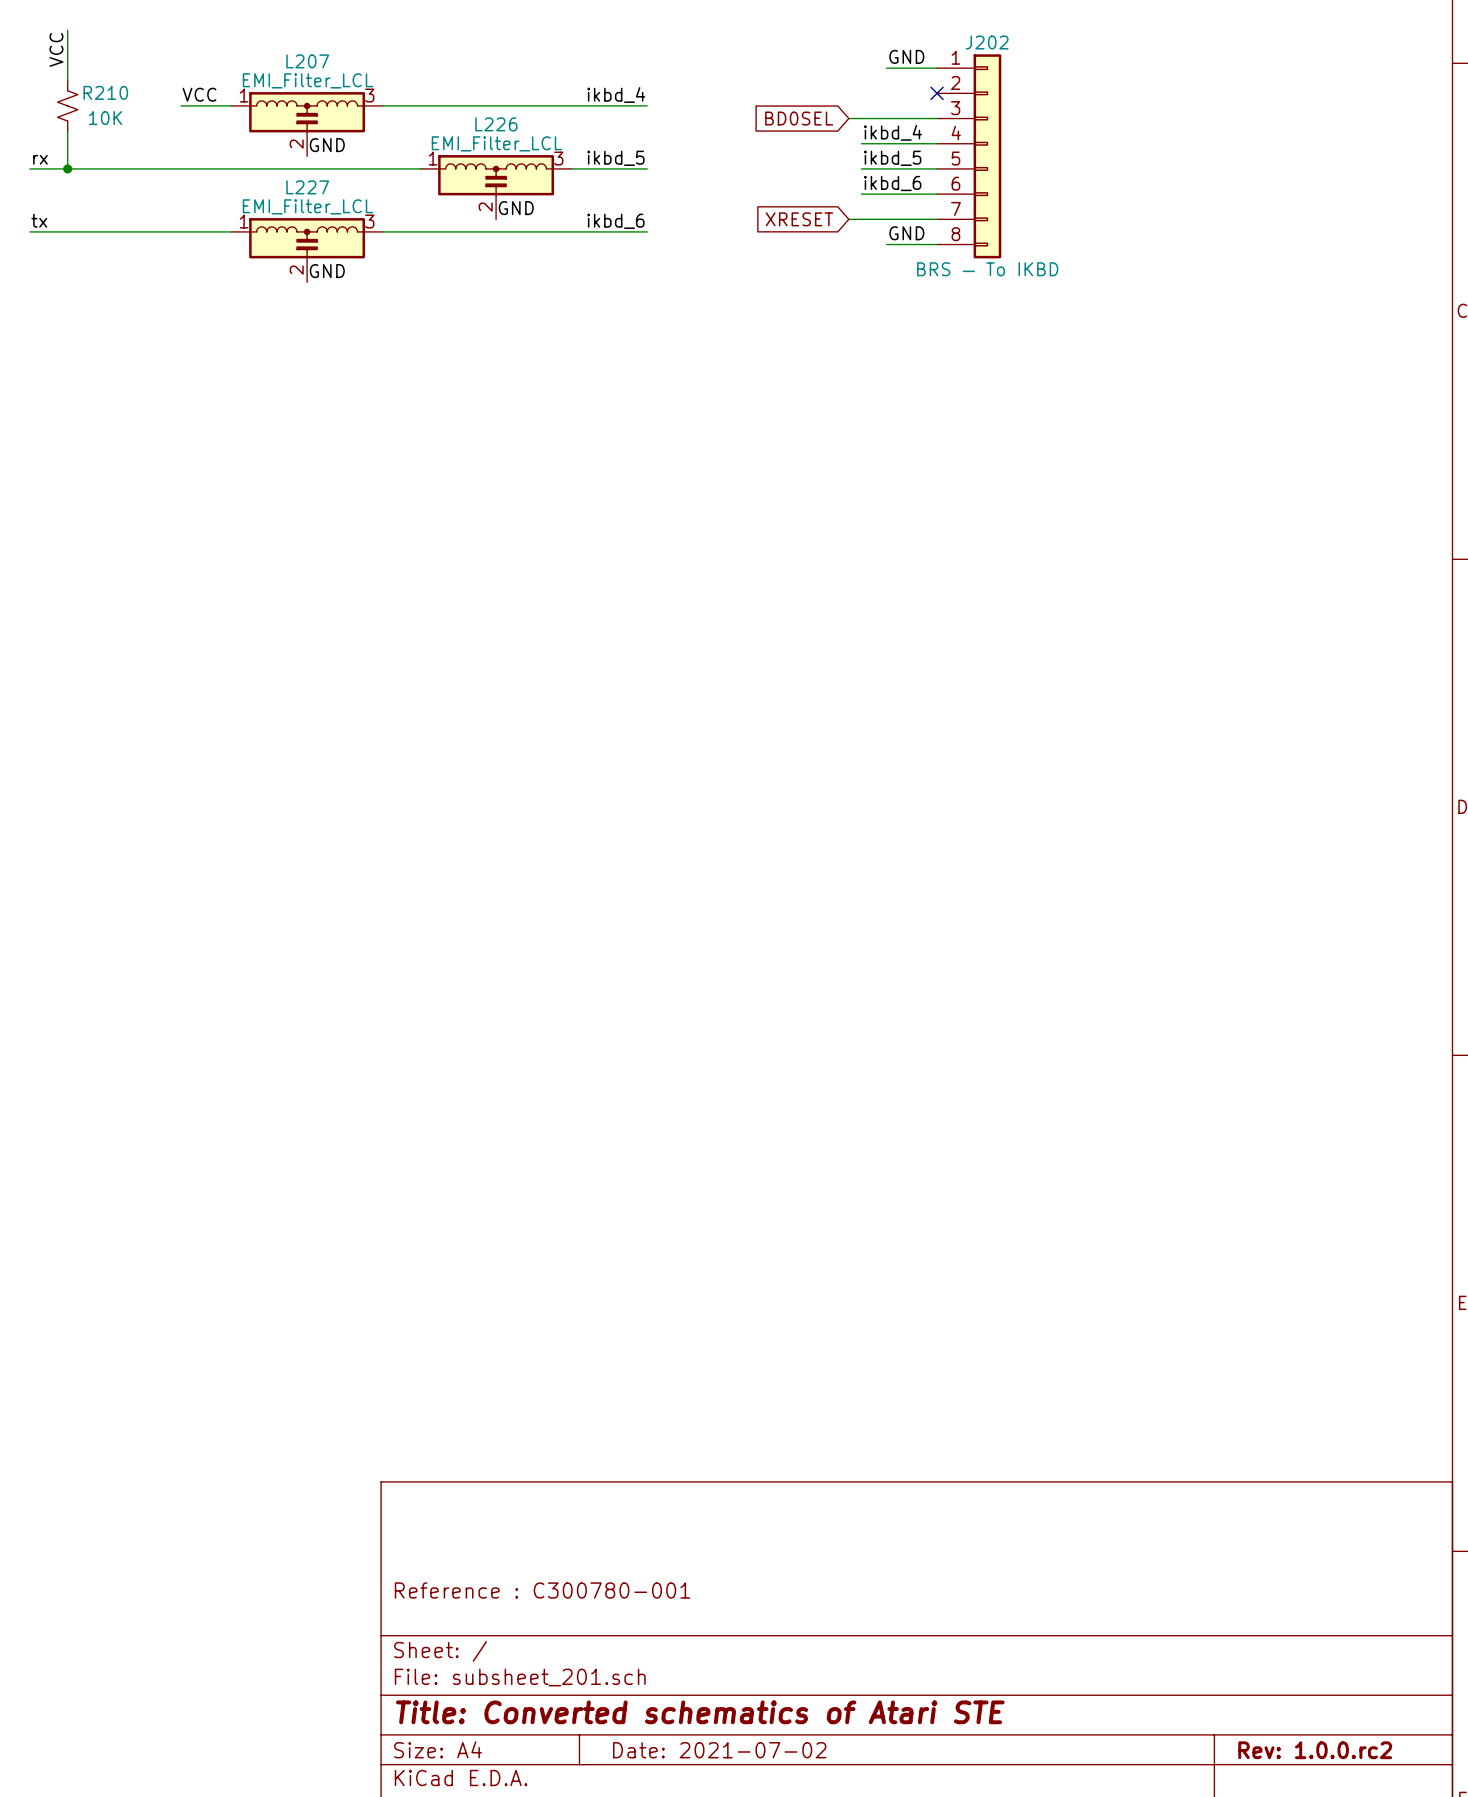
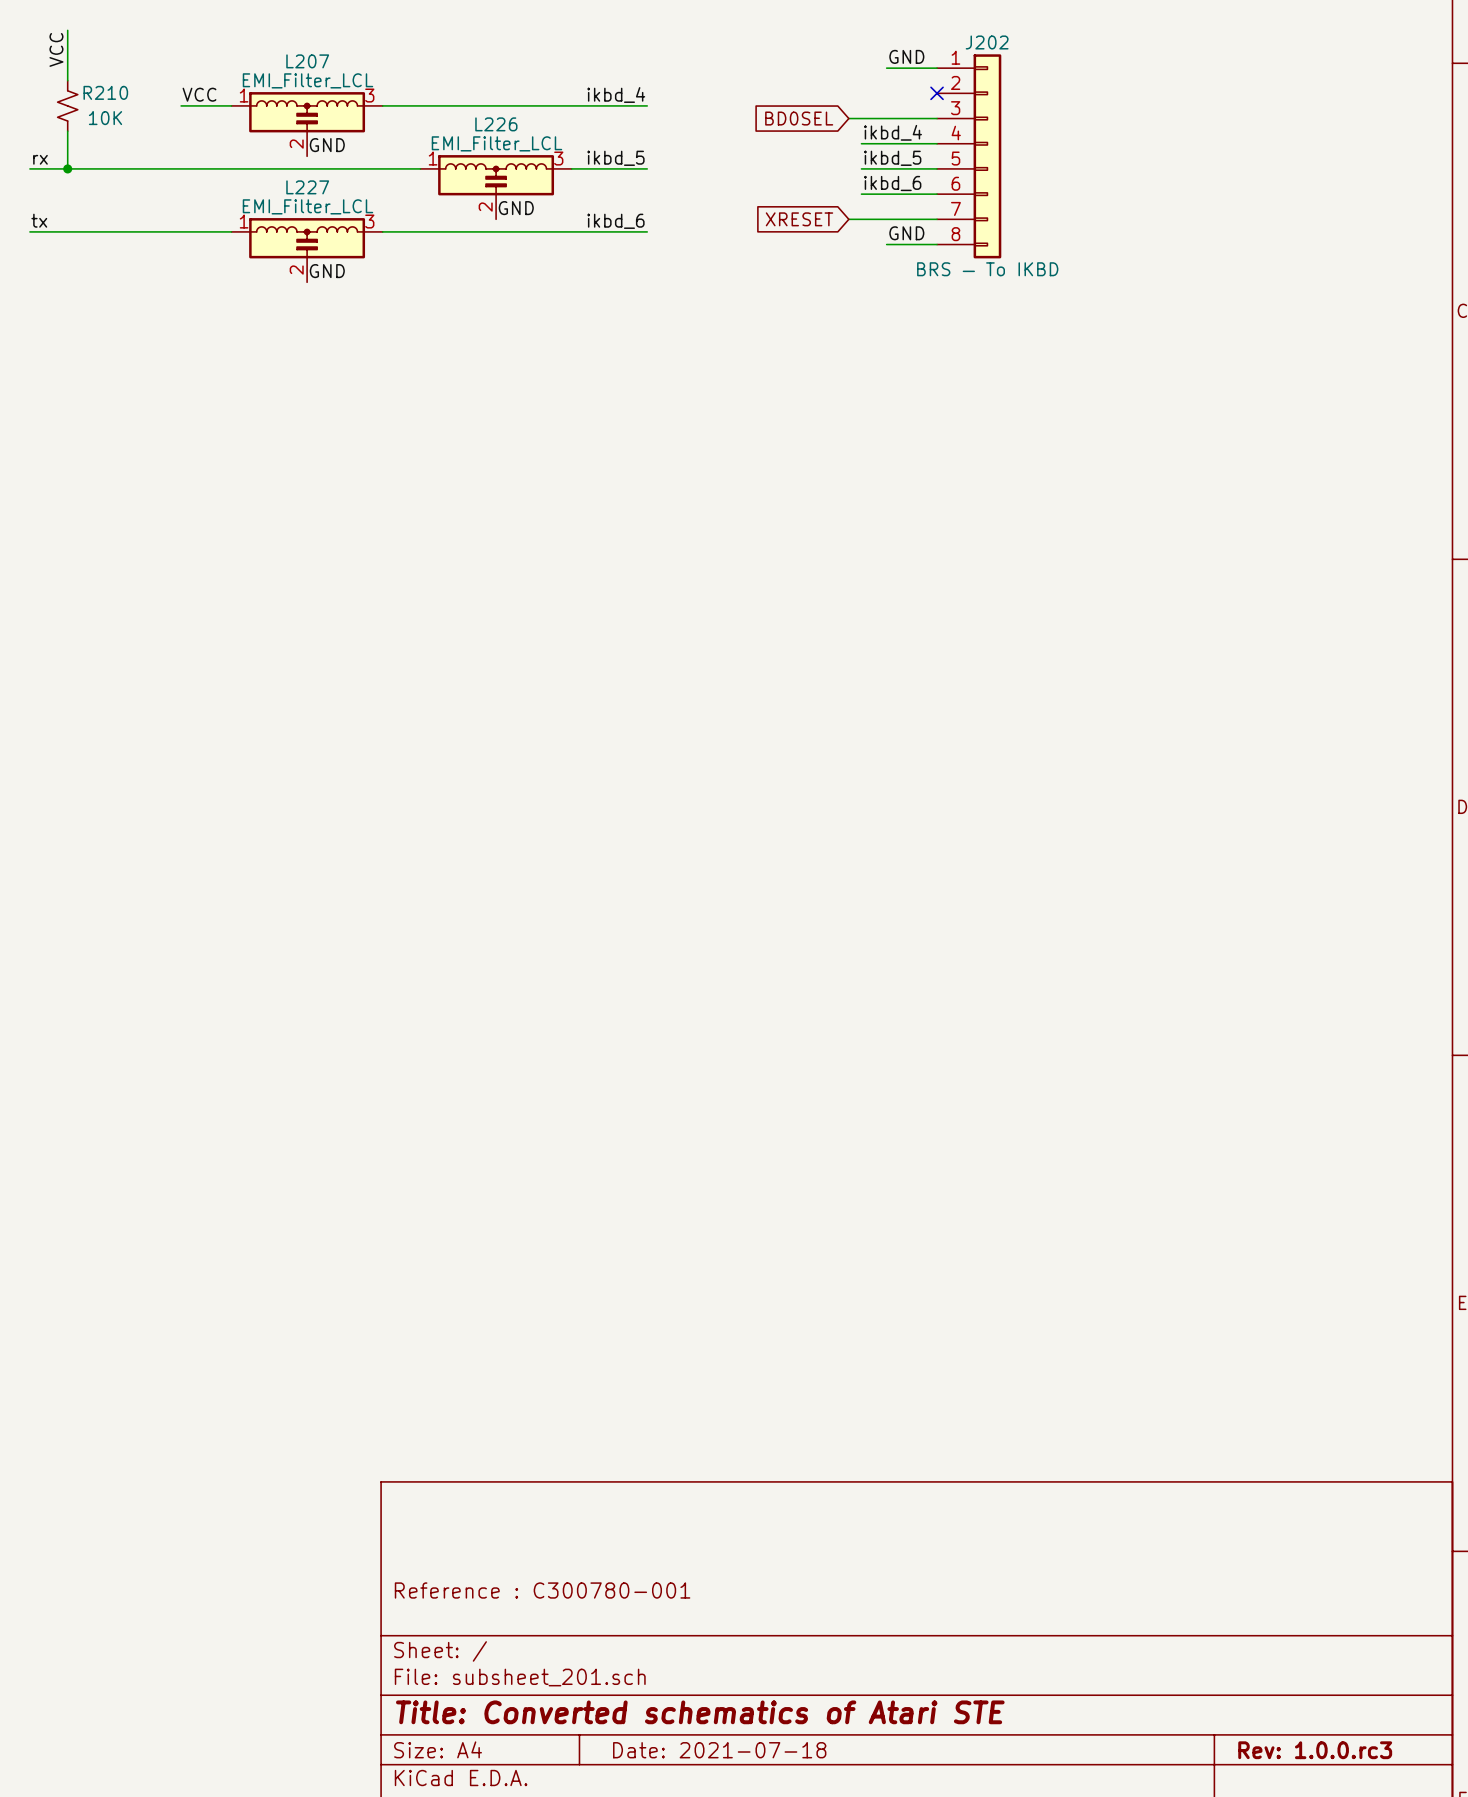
title block: Date: 2021-07-02 (719, 1750) -> Date: 2021-07-18 (719, 1750)
title block: Rev: 1.0.0.rc2 (1315, 1750) -> Rev: 1.0.0.rc3 (1315, 1750)

